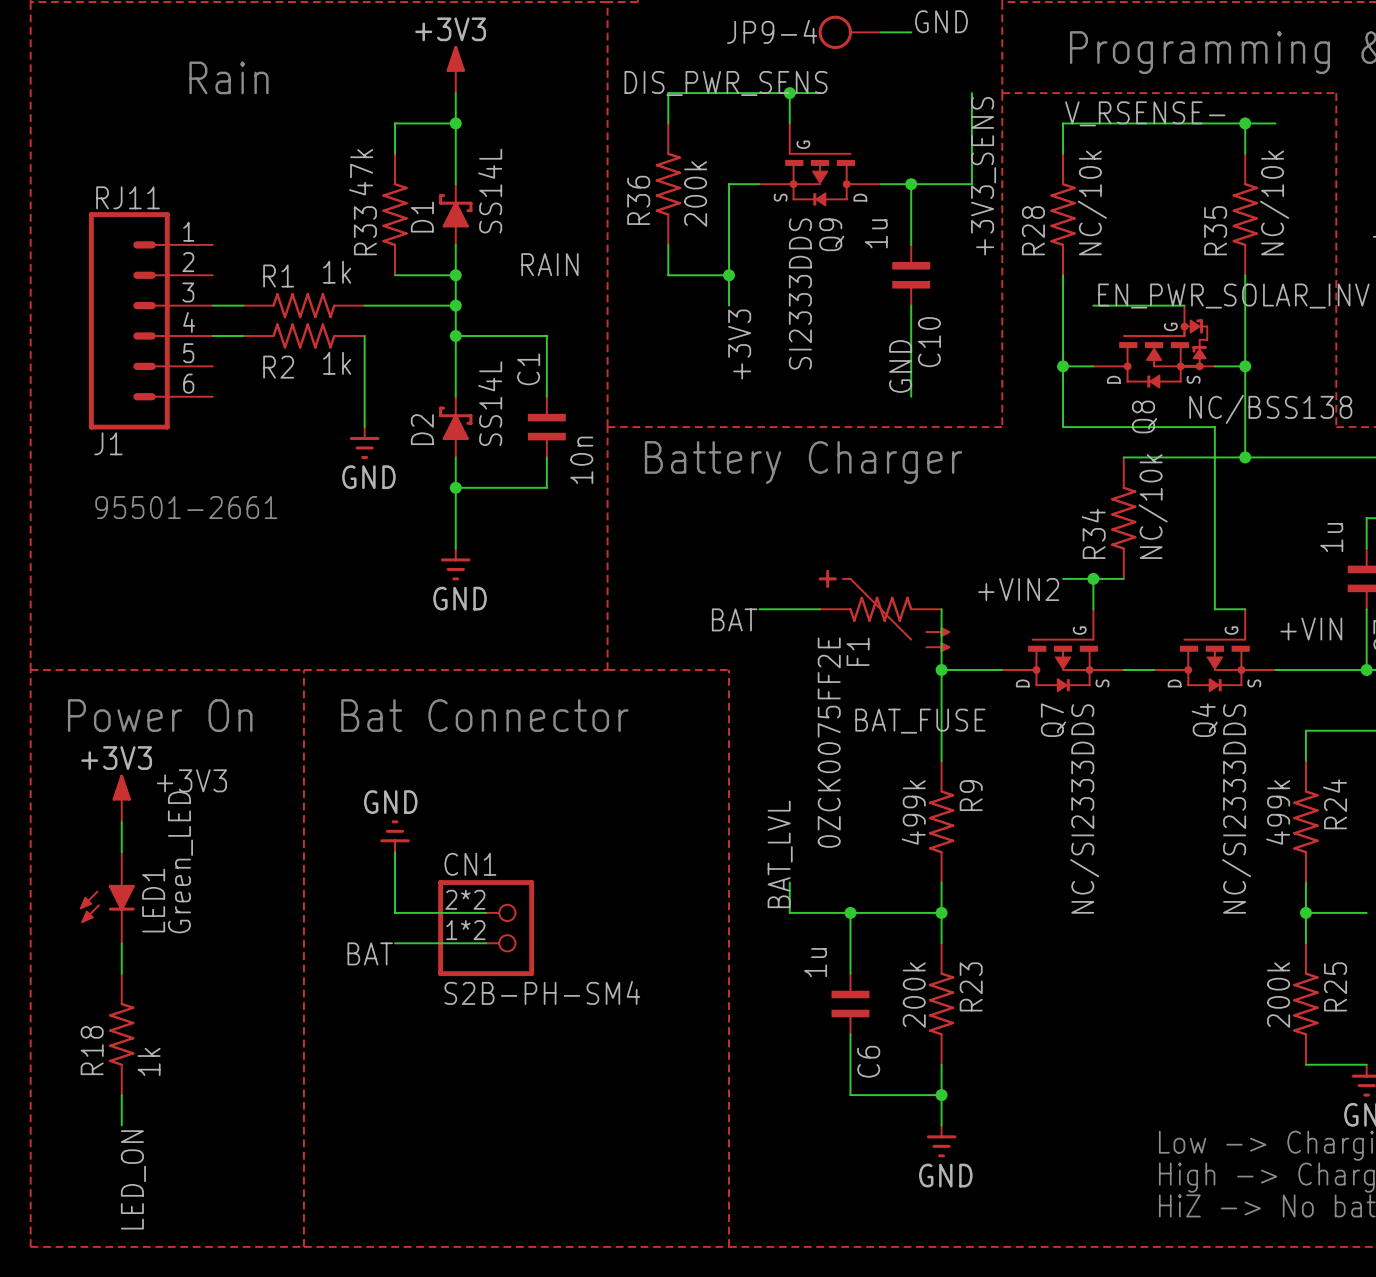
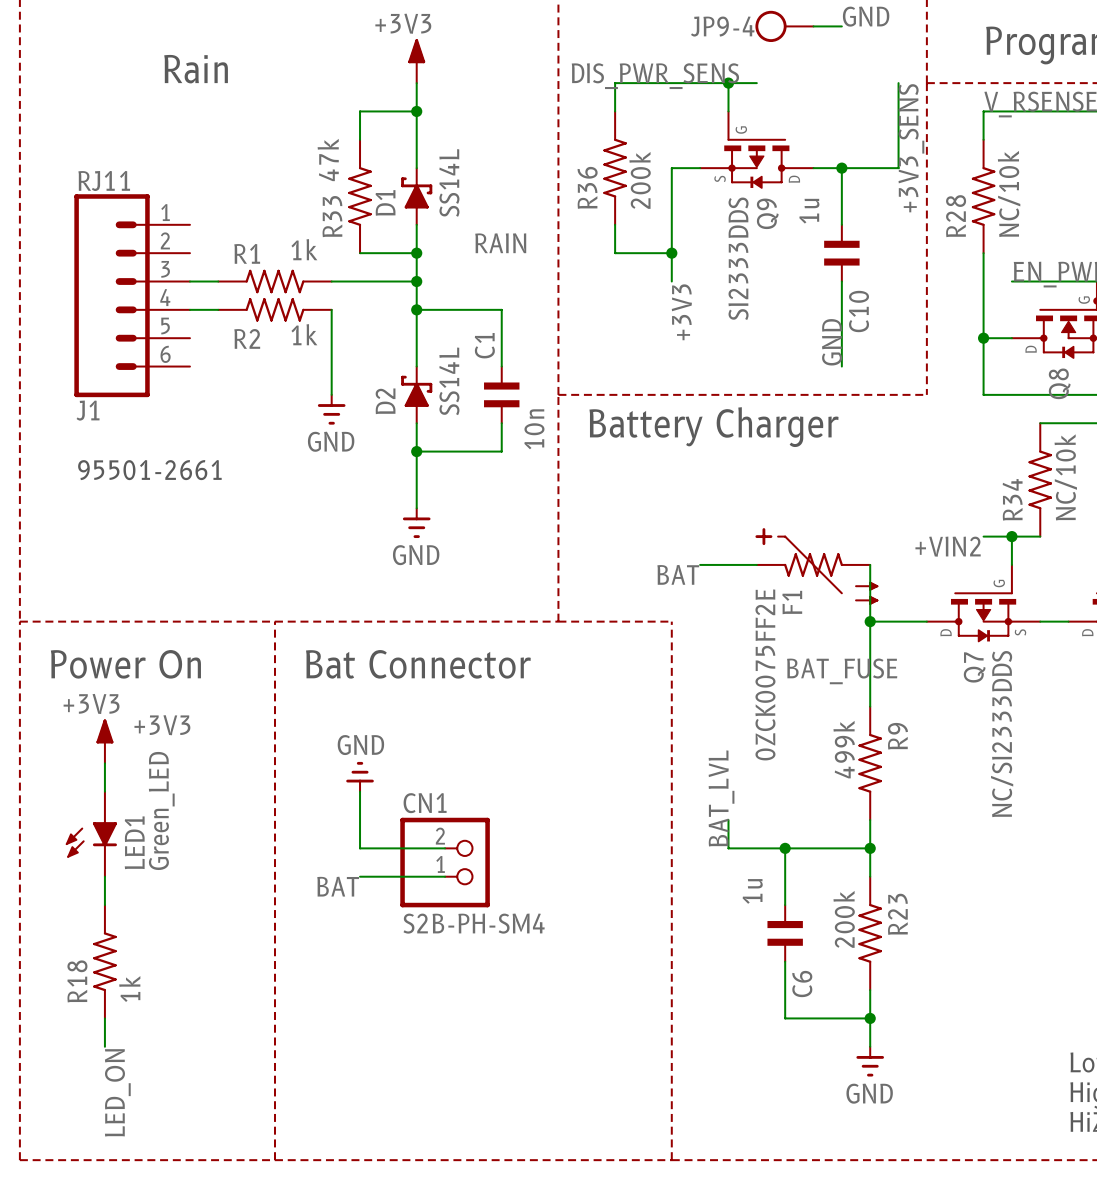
CN1 pin number: 2*2 (465, 899) -> 2 (440, 836)
CN1 pin number: 1*2 (465, 930) -> 1 (440, 864)

